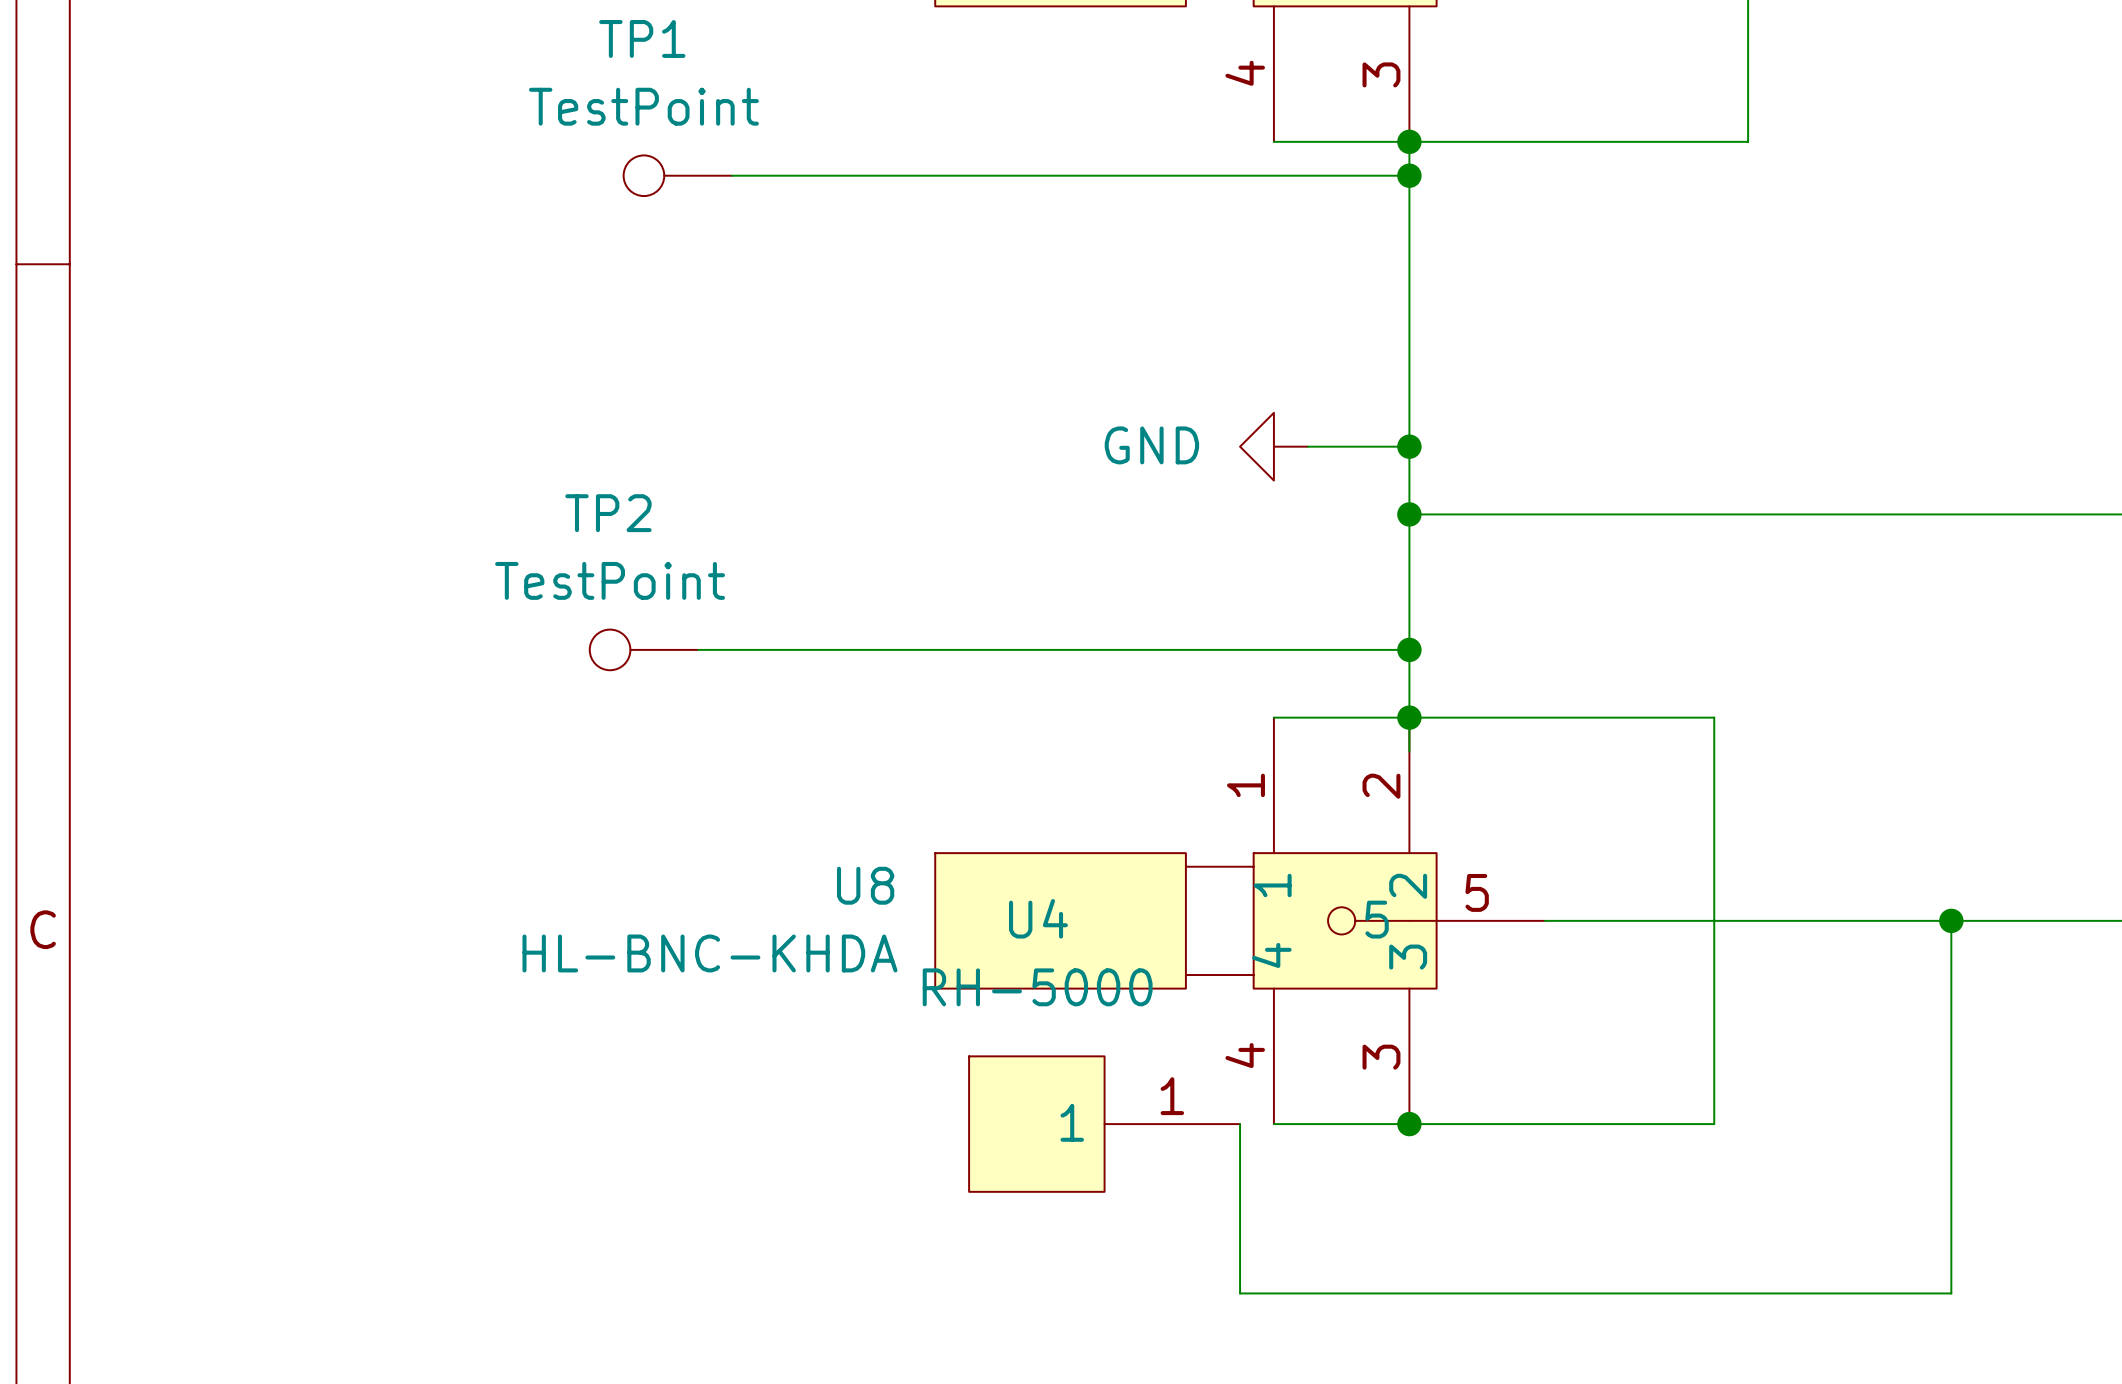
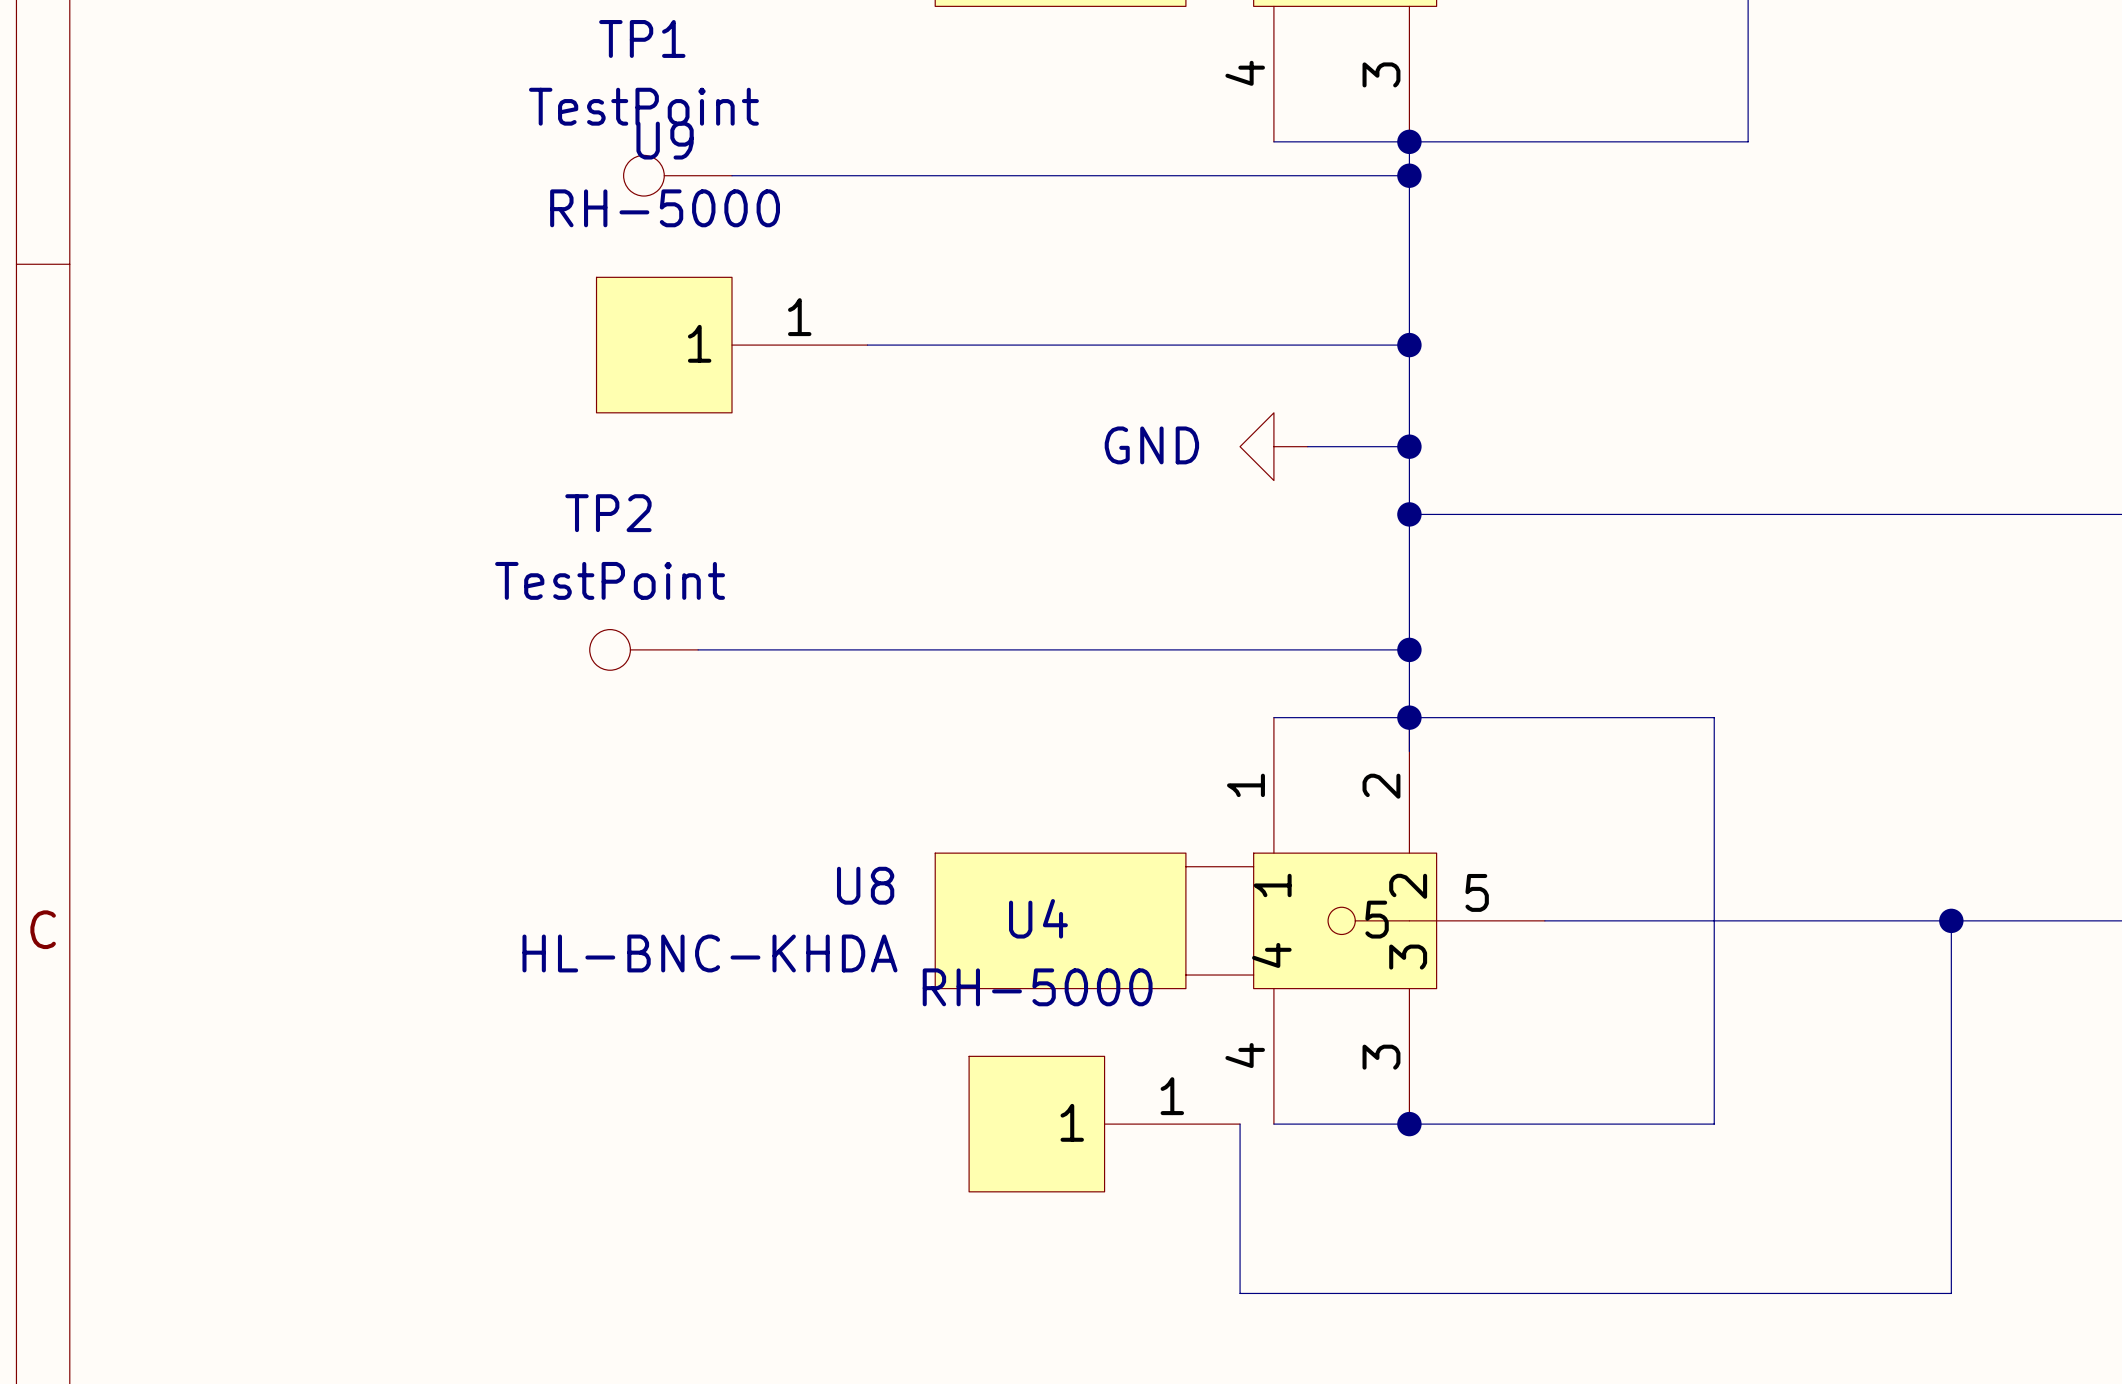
U9: none -> RH-5000 (732, 345)
wire: none -> (867, 345) (1409, 345)
junction: none -> (1409, 345)

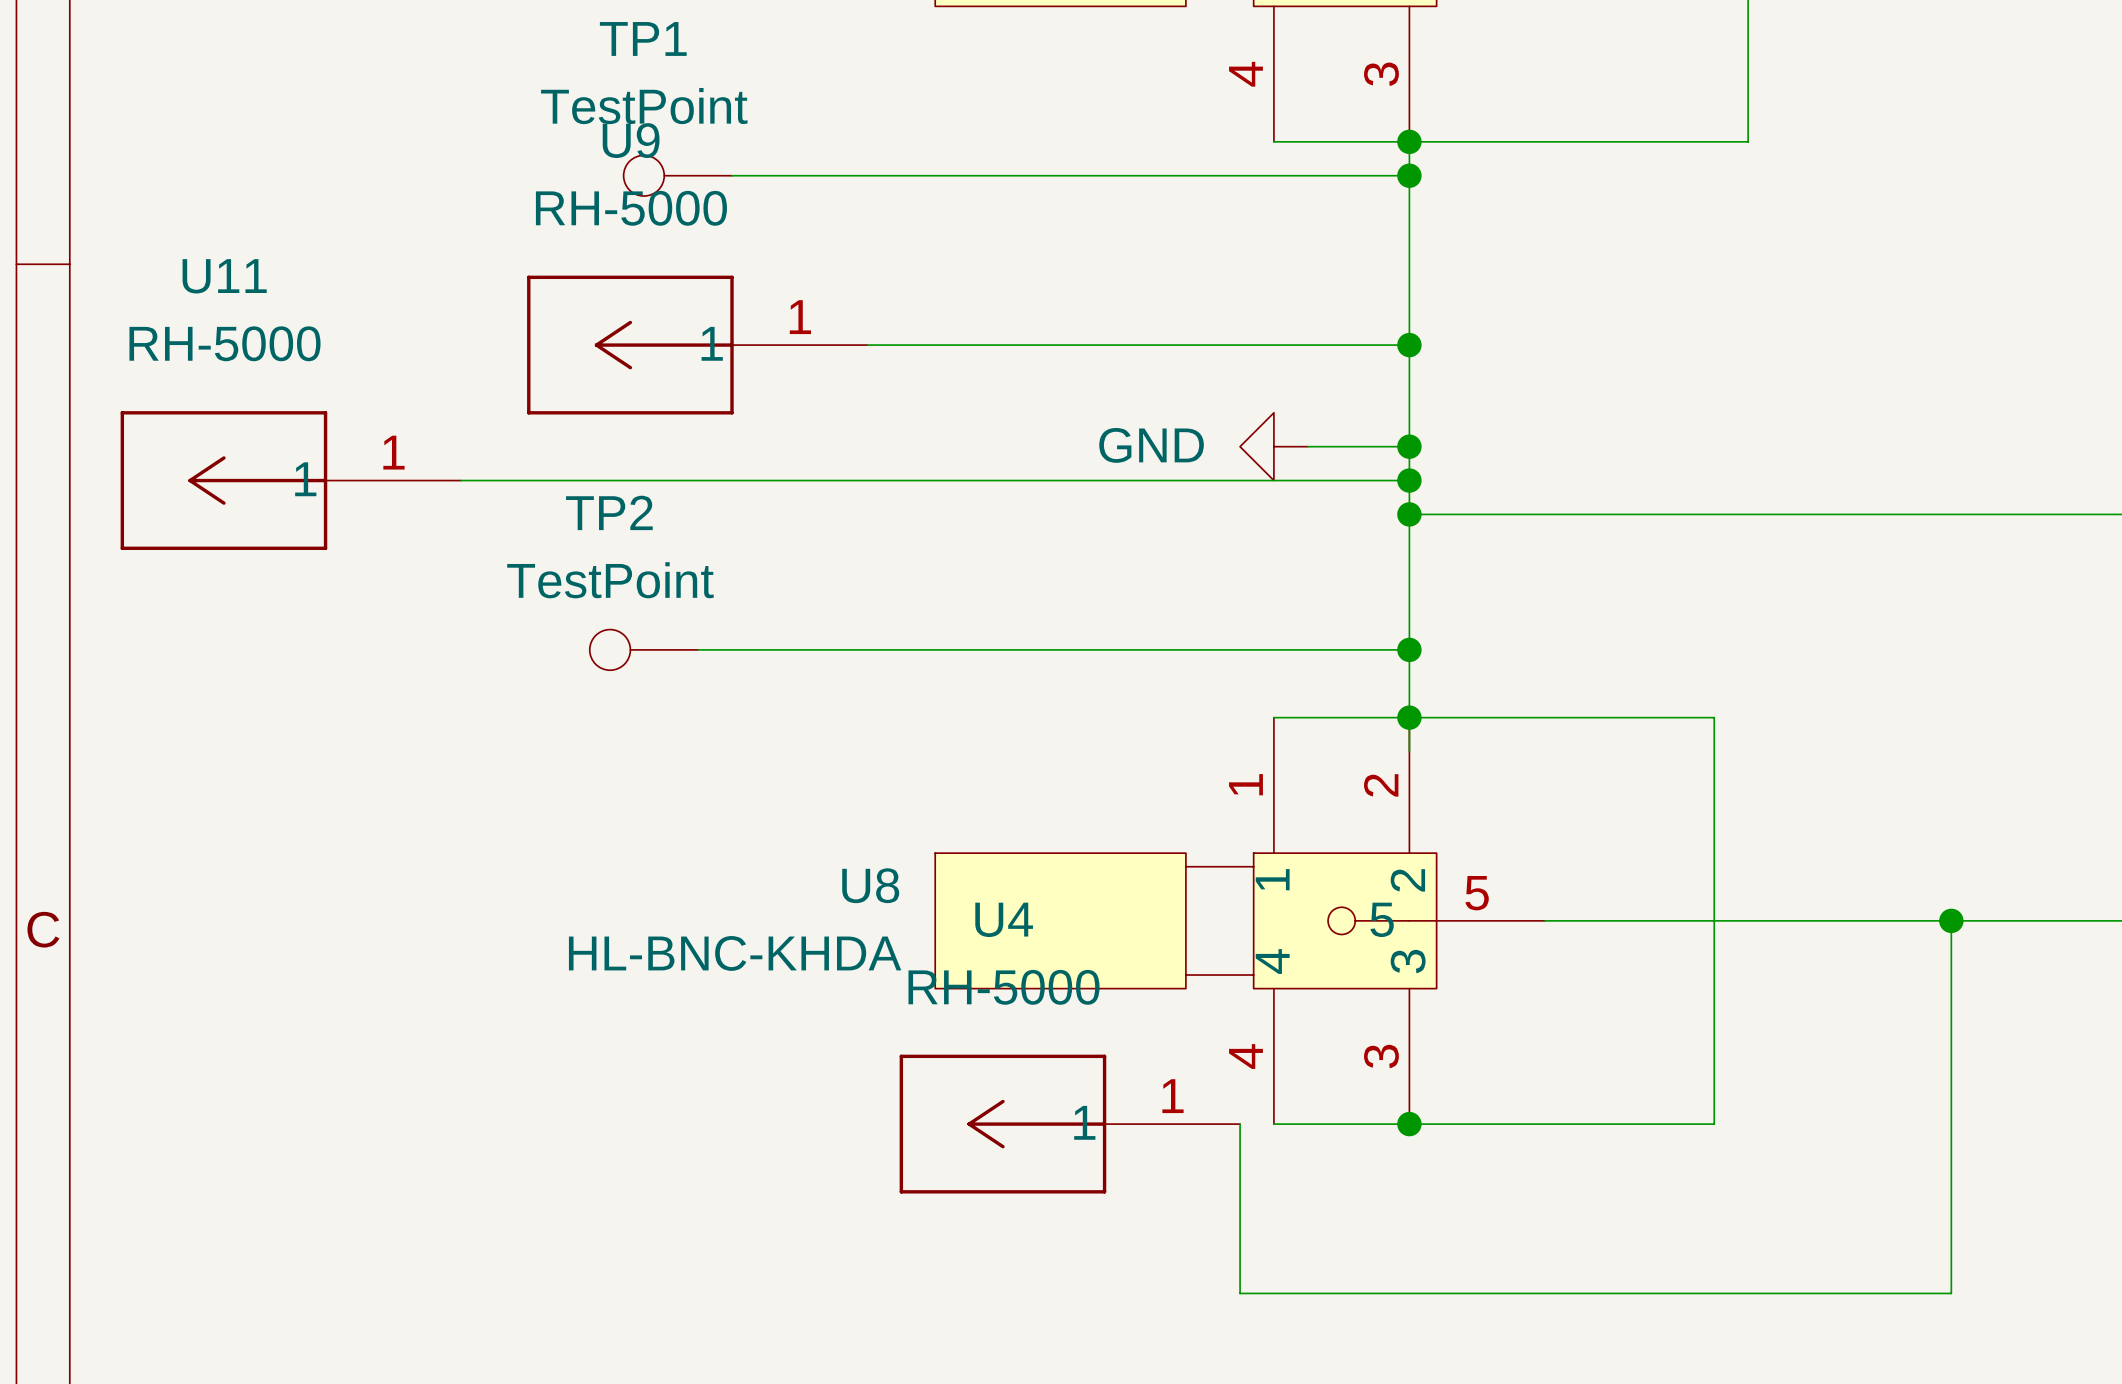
U9 symbol: [596, 277, 868, 413] -> [527, 275, 868, 415]
U11: none -> RH-5000 (290, 480)
wire: none -> (461, 480) (1409, 480)
junction: none -> (1409, 480)
U4 symbol: [969, 1056, 1241, 1192] -> [899, 1054, 1241, 1194]

